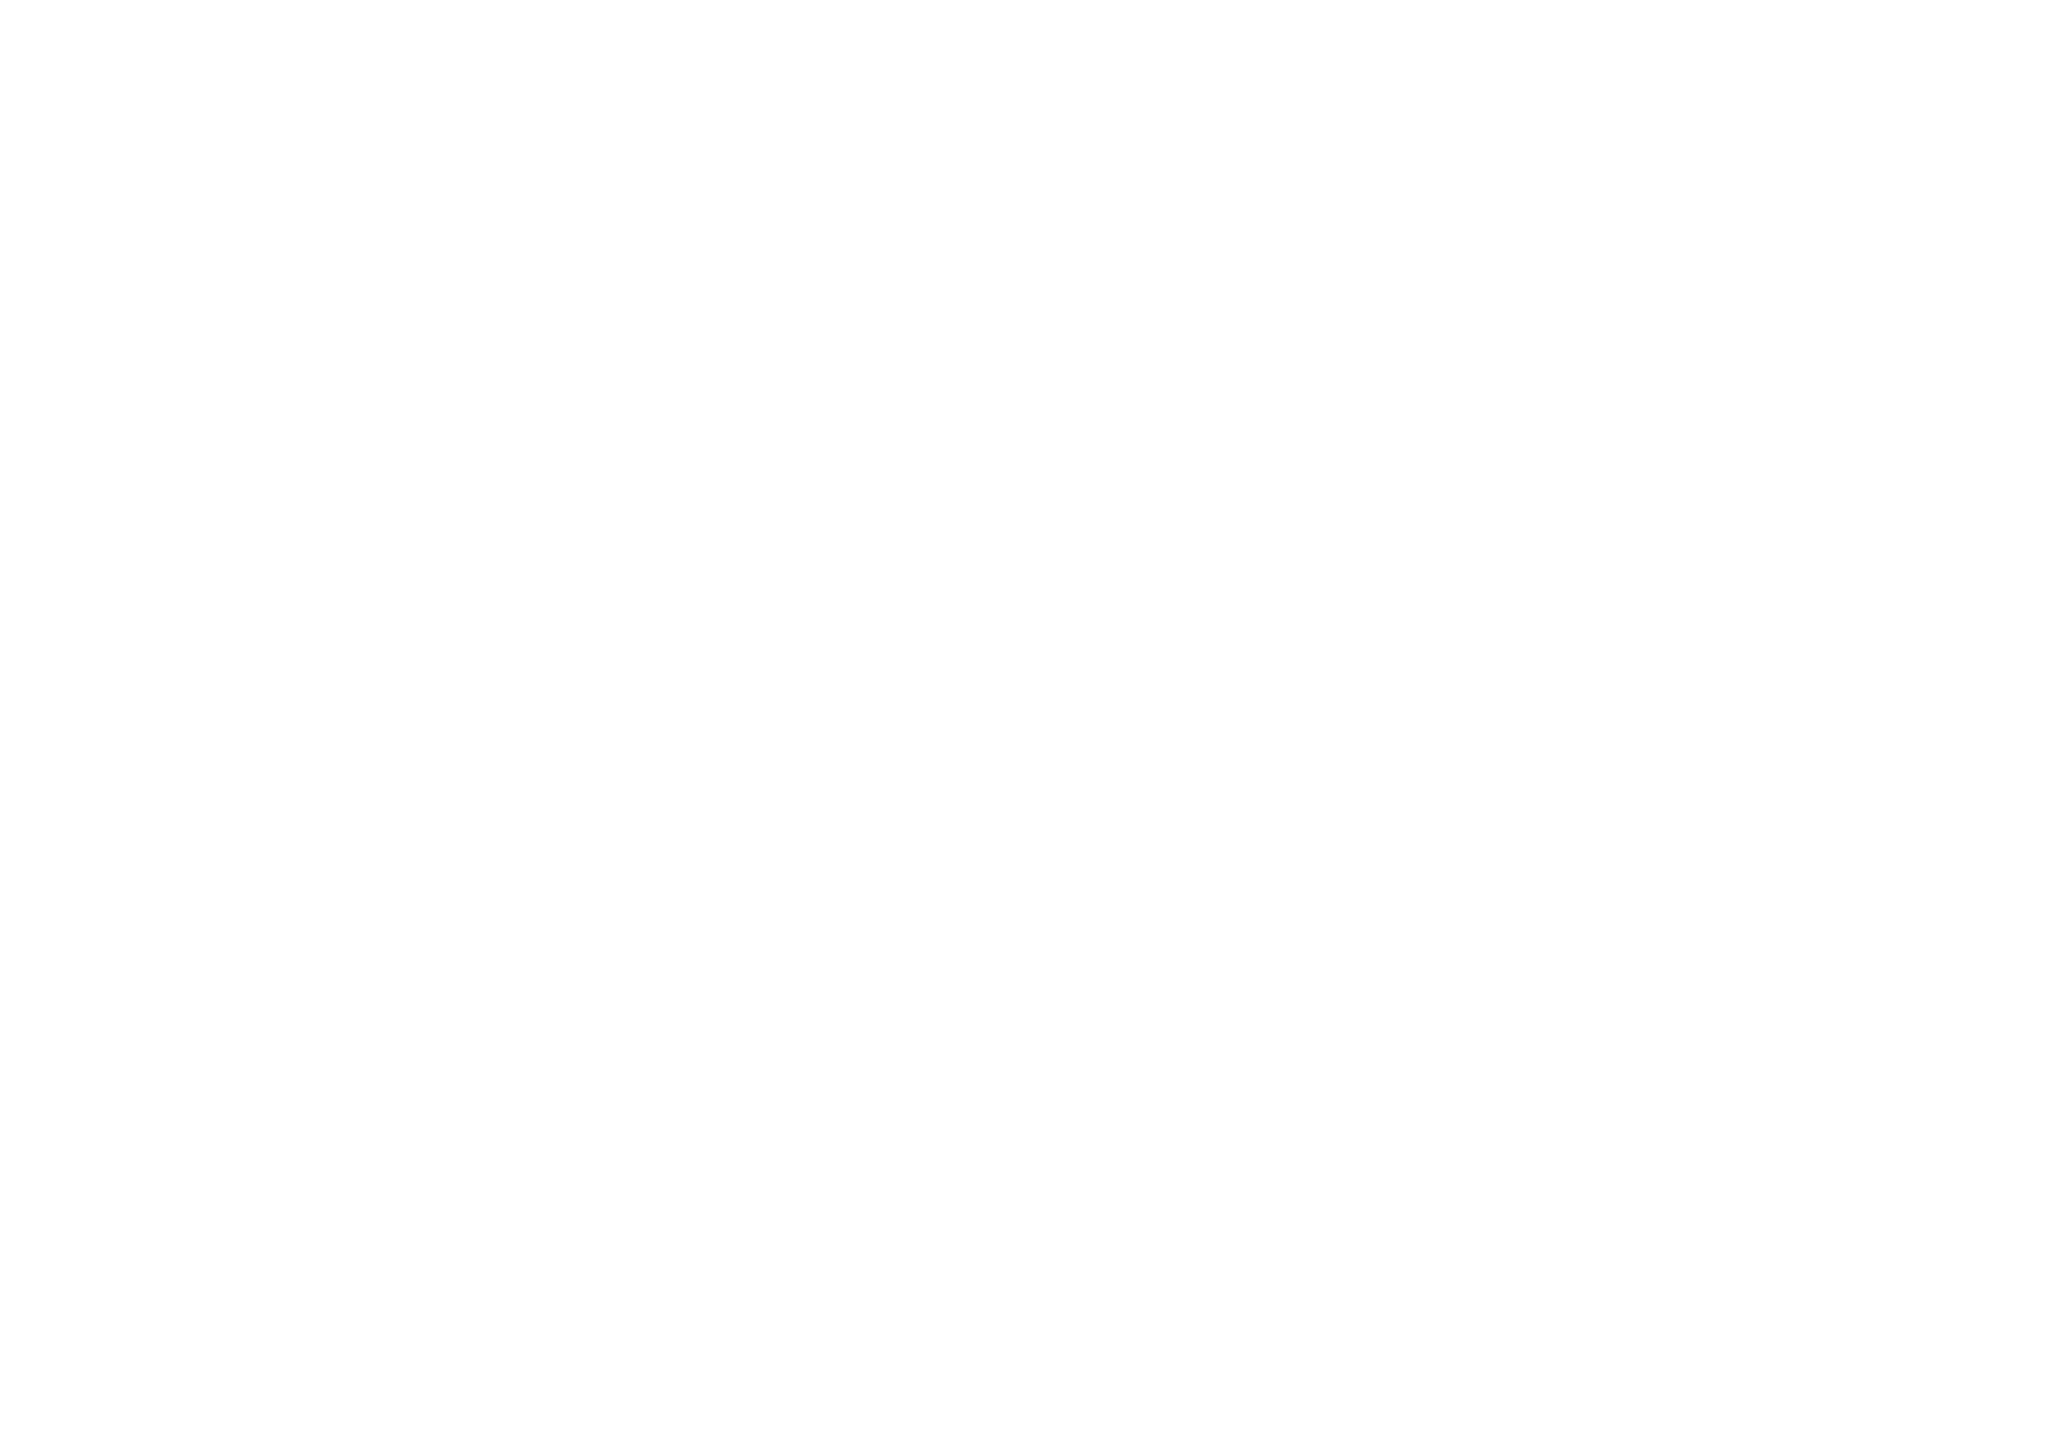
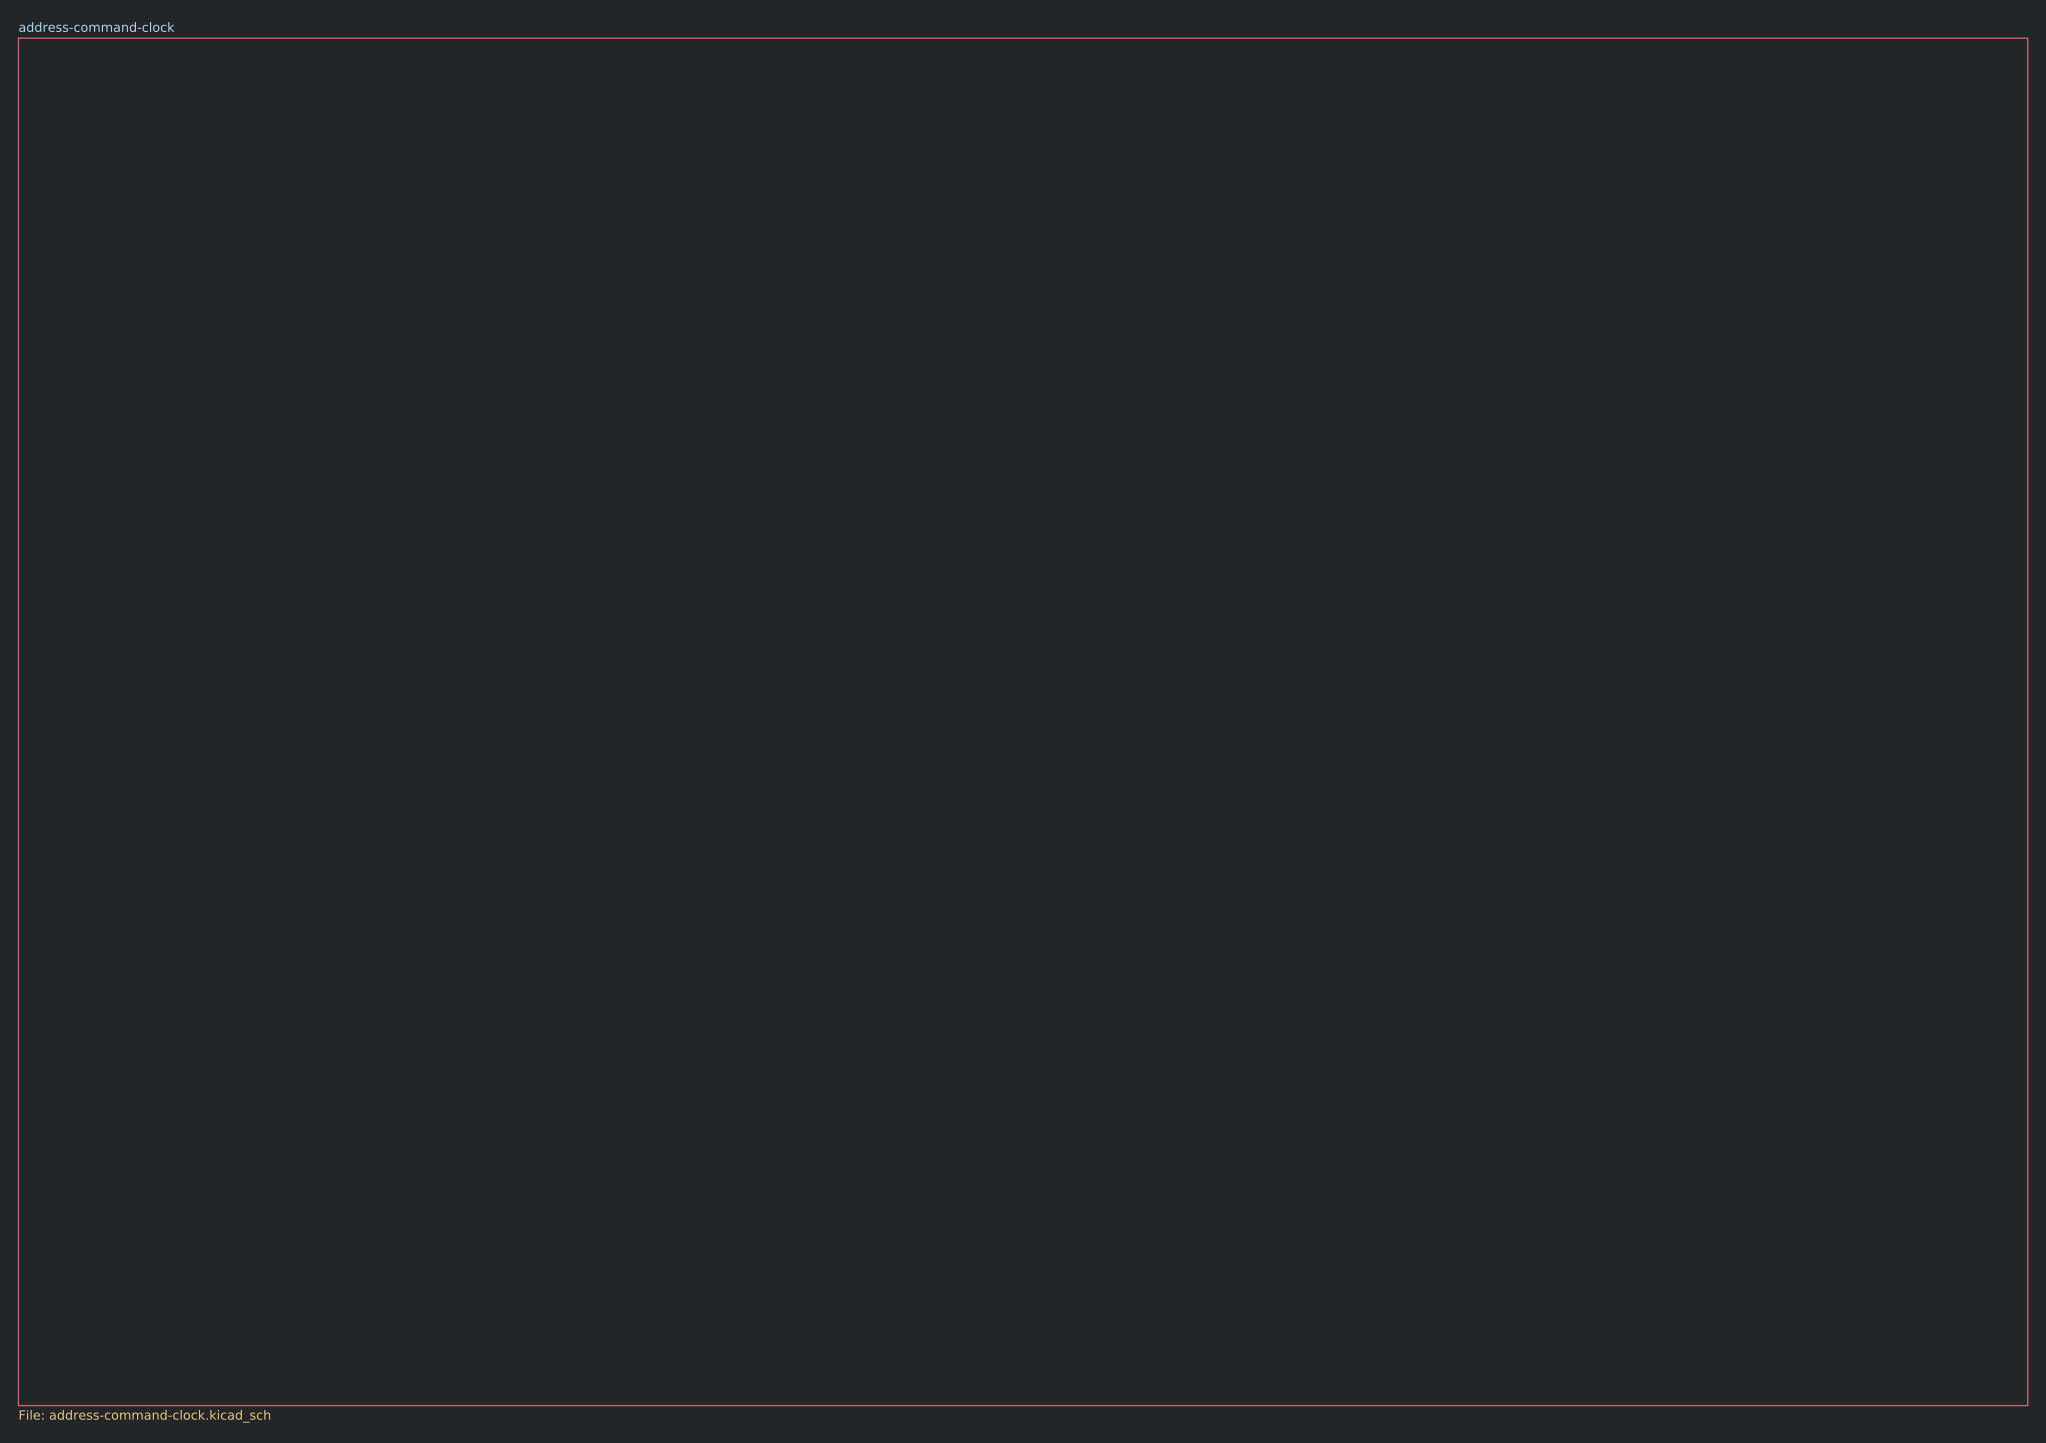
sheet address-command-clock: none -> File: address-command-clock.kicad_sch (1023, 721)

